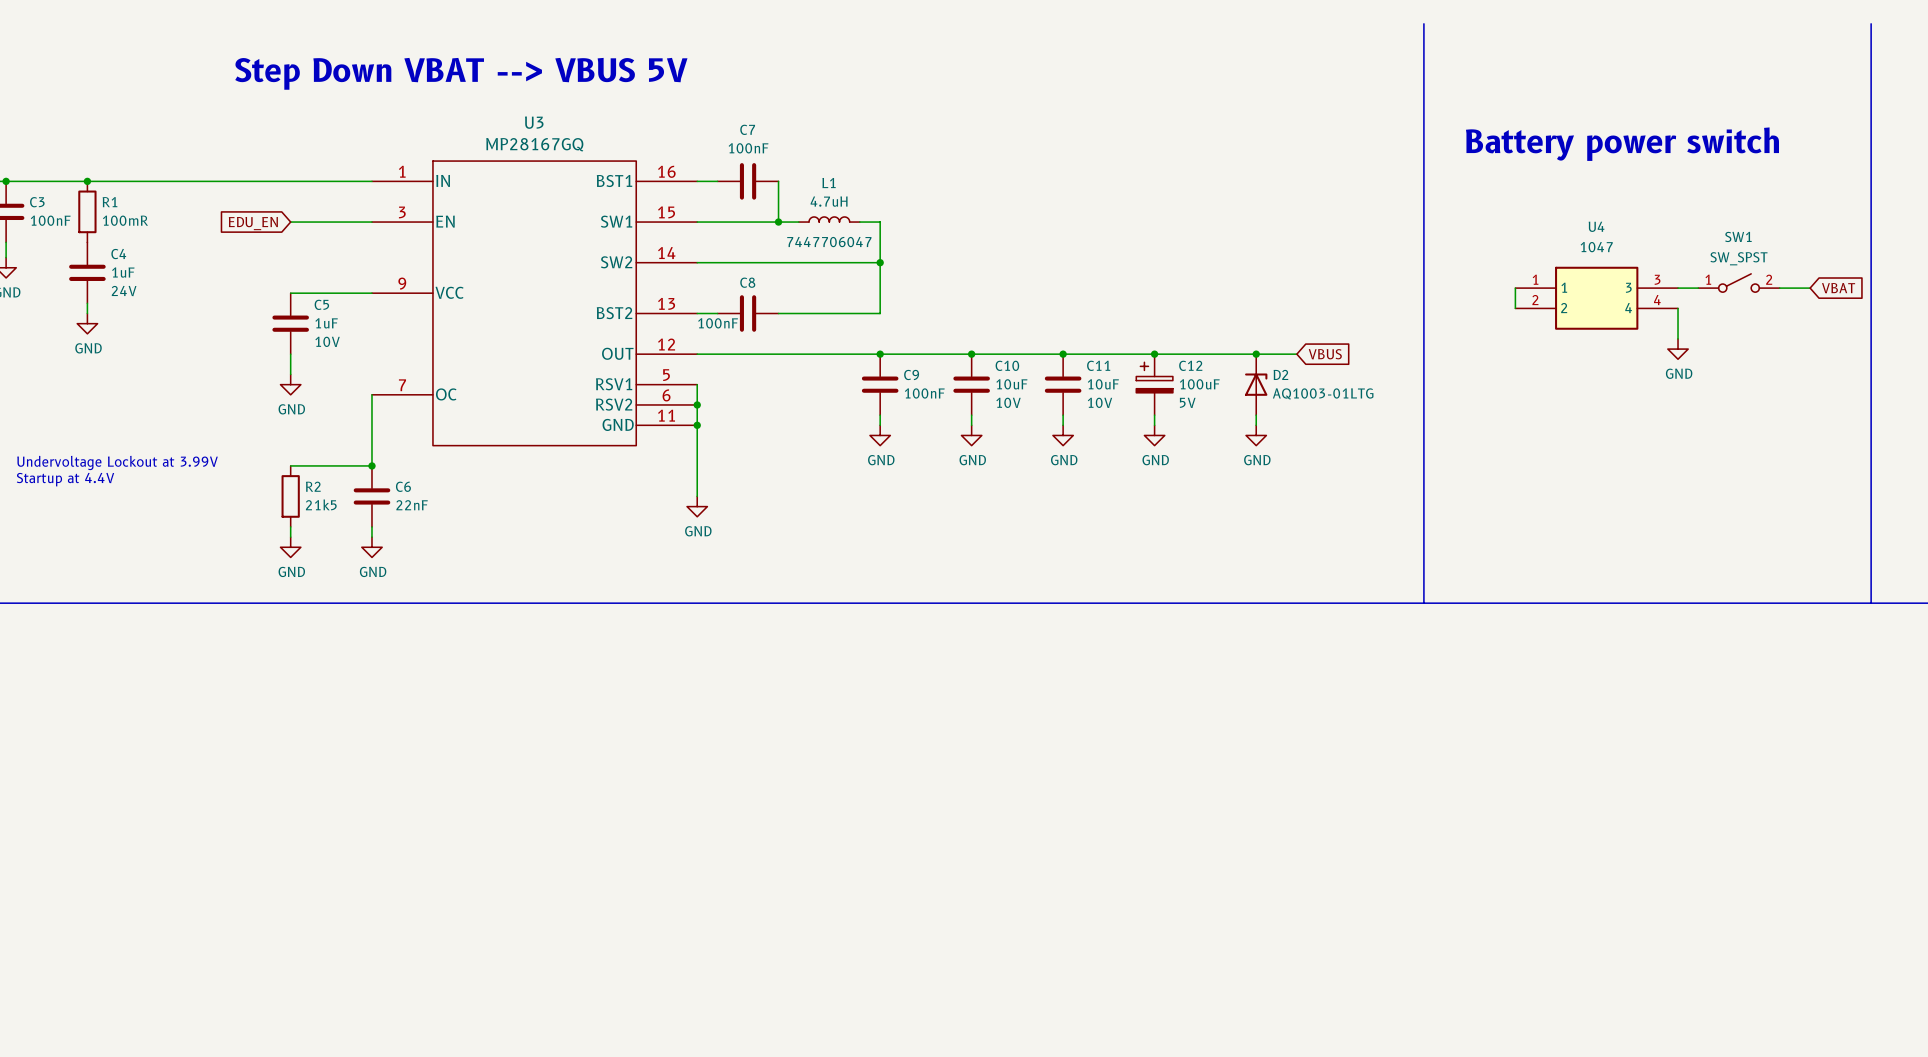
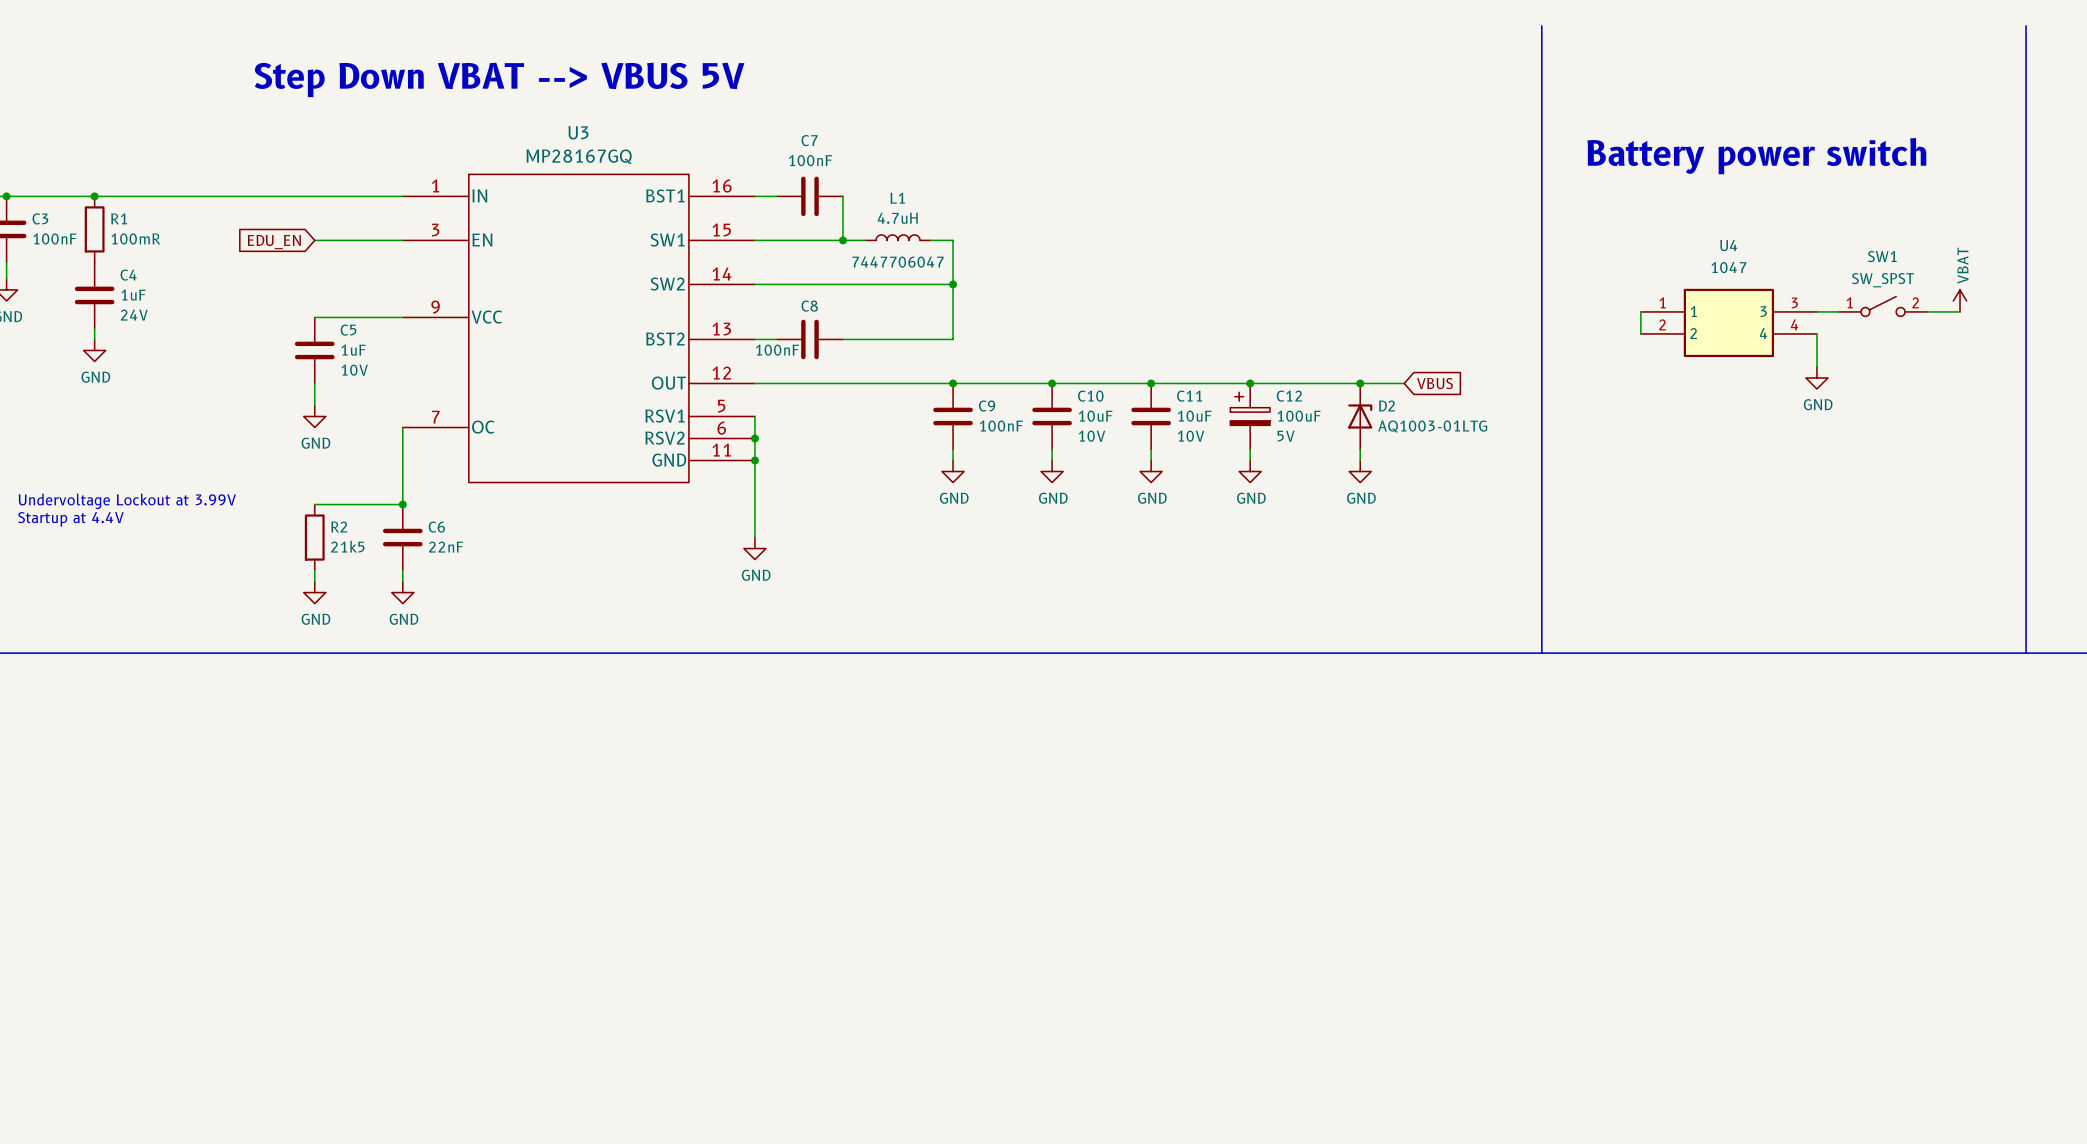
power symbol: none -> VBAT (1960, 300)
global label: VBAT (1838, 288) -> none

